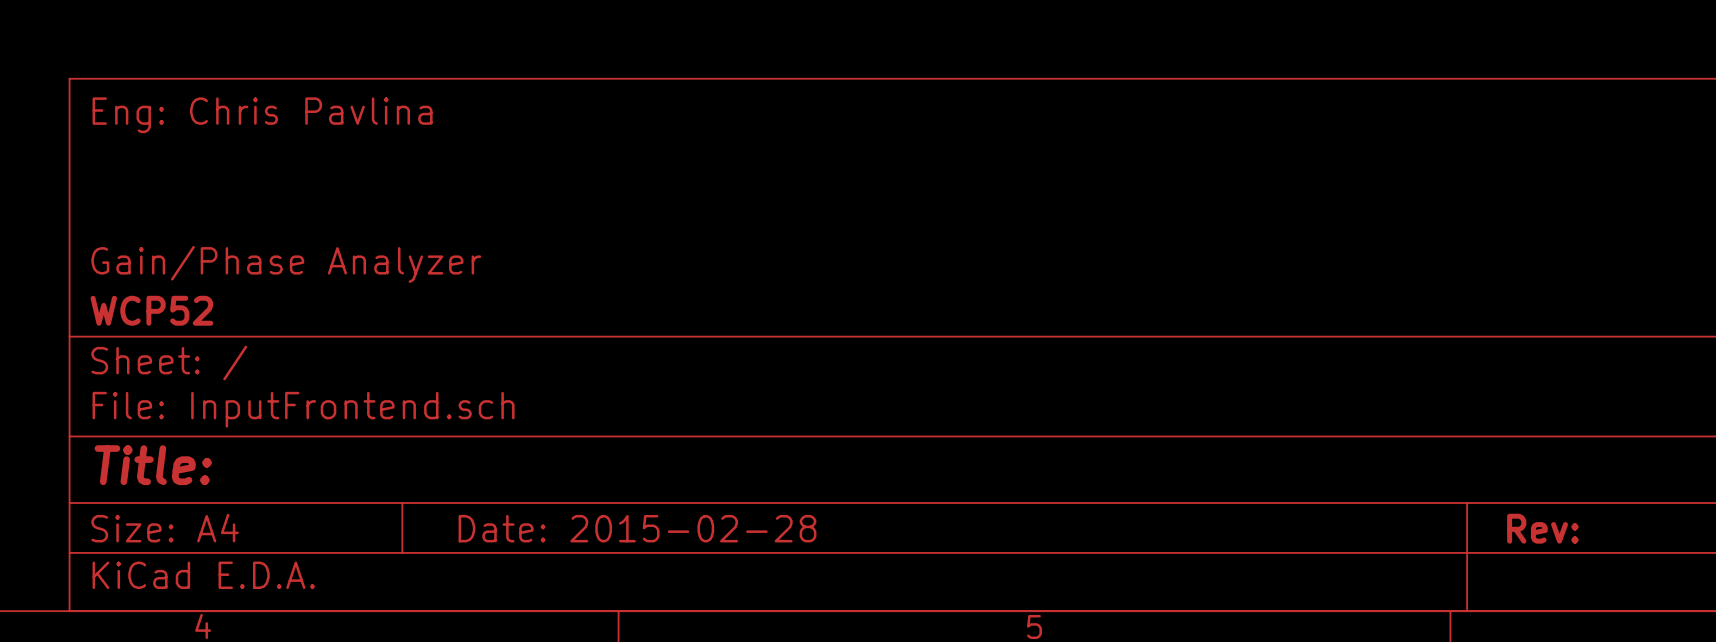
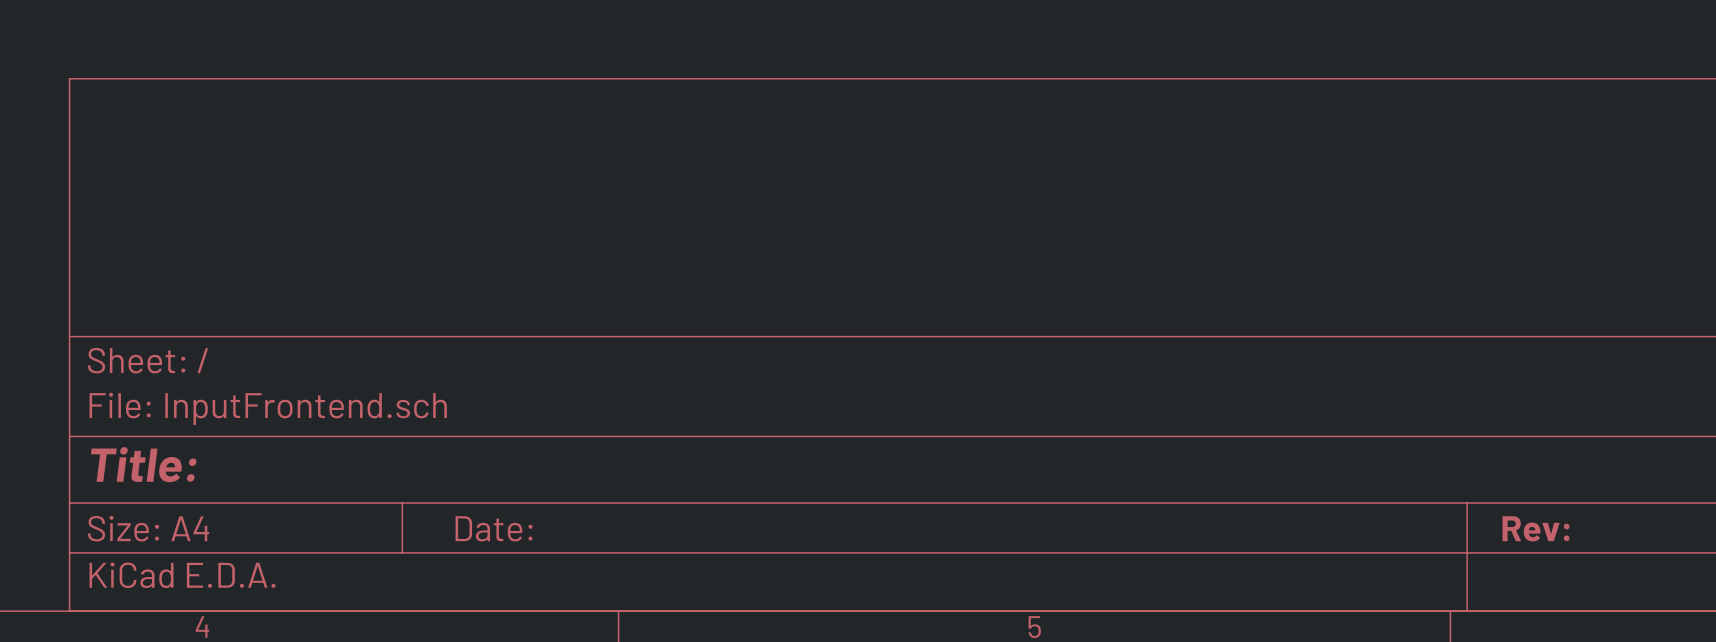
title block: Eng: Chris Pavlina (262, 115) -> none
title block: Gain/Phase Analyzer (286, 264) -> none
title block: WCP52 (151, 310) -> none
title block: Date: 2015-02-28 (637, 528) -> Date: (494, 528)

